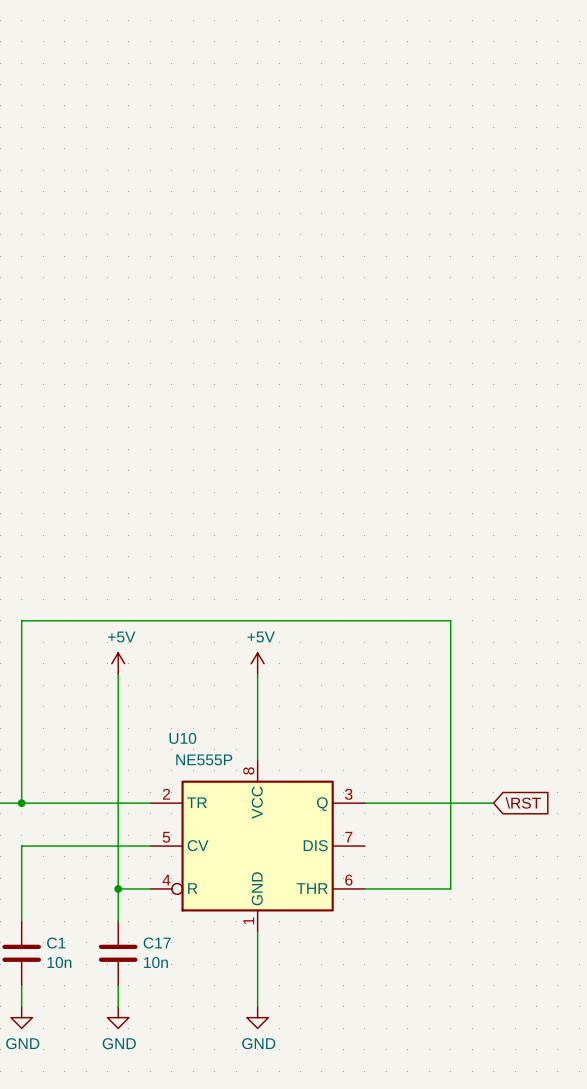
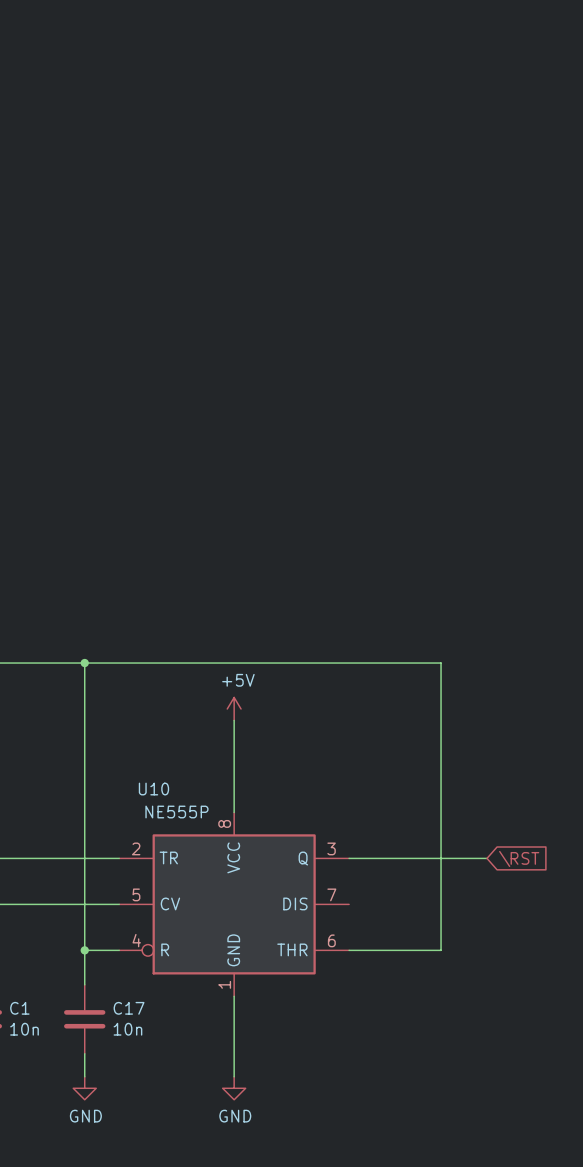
wire: none -> (84, 663) (84, 720)
junction: none -> (84, 663)
power symbol: +5V (118, 663) -> none

